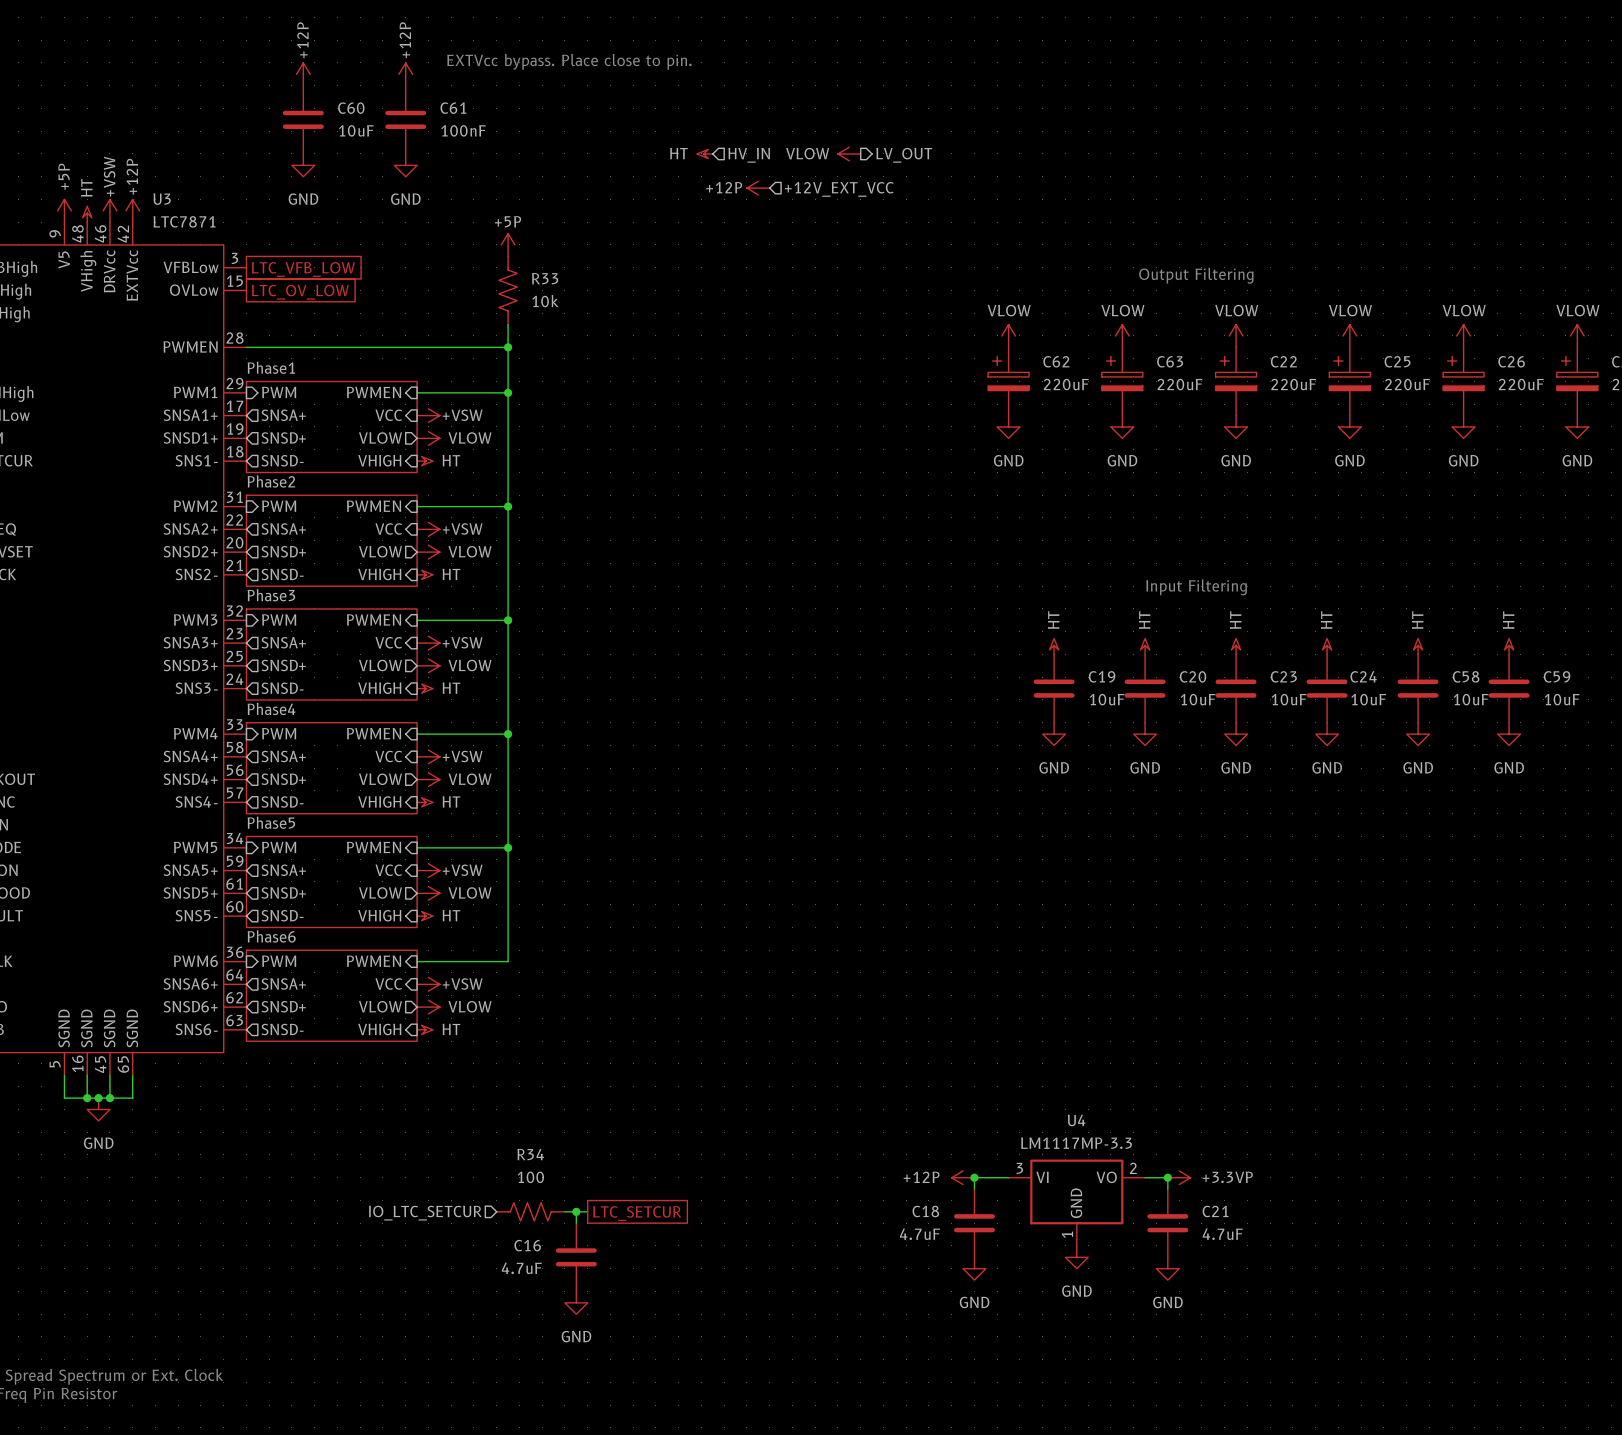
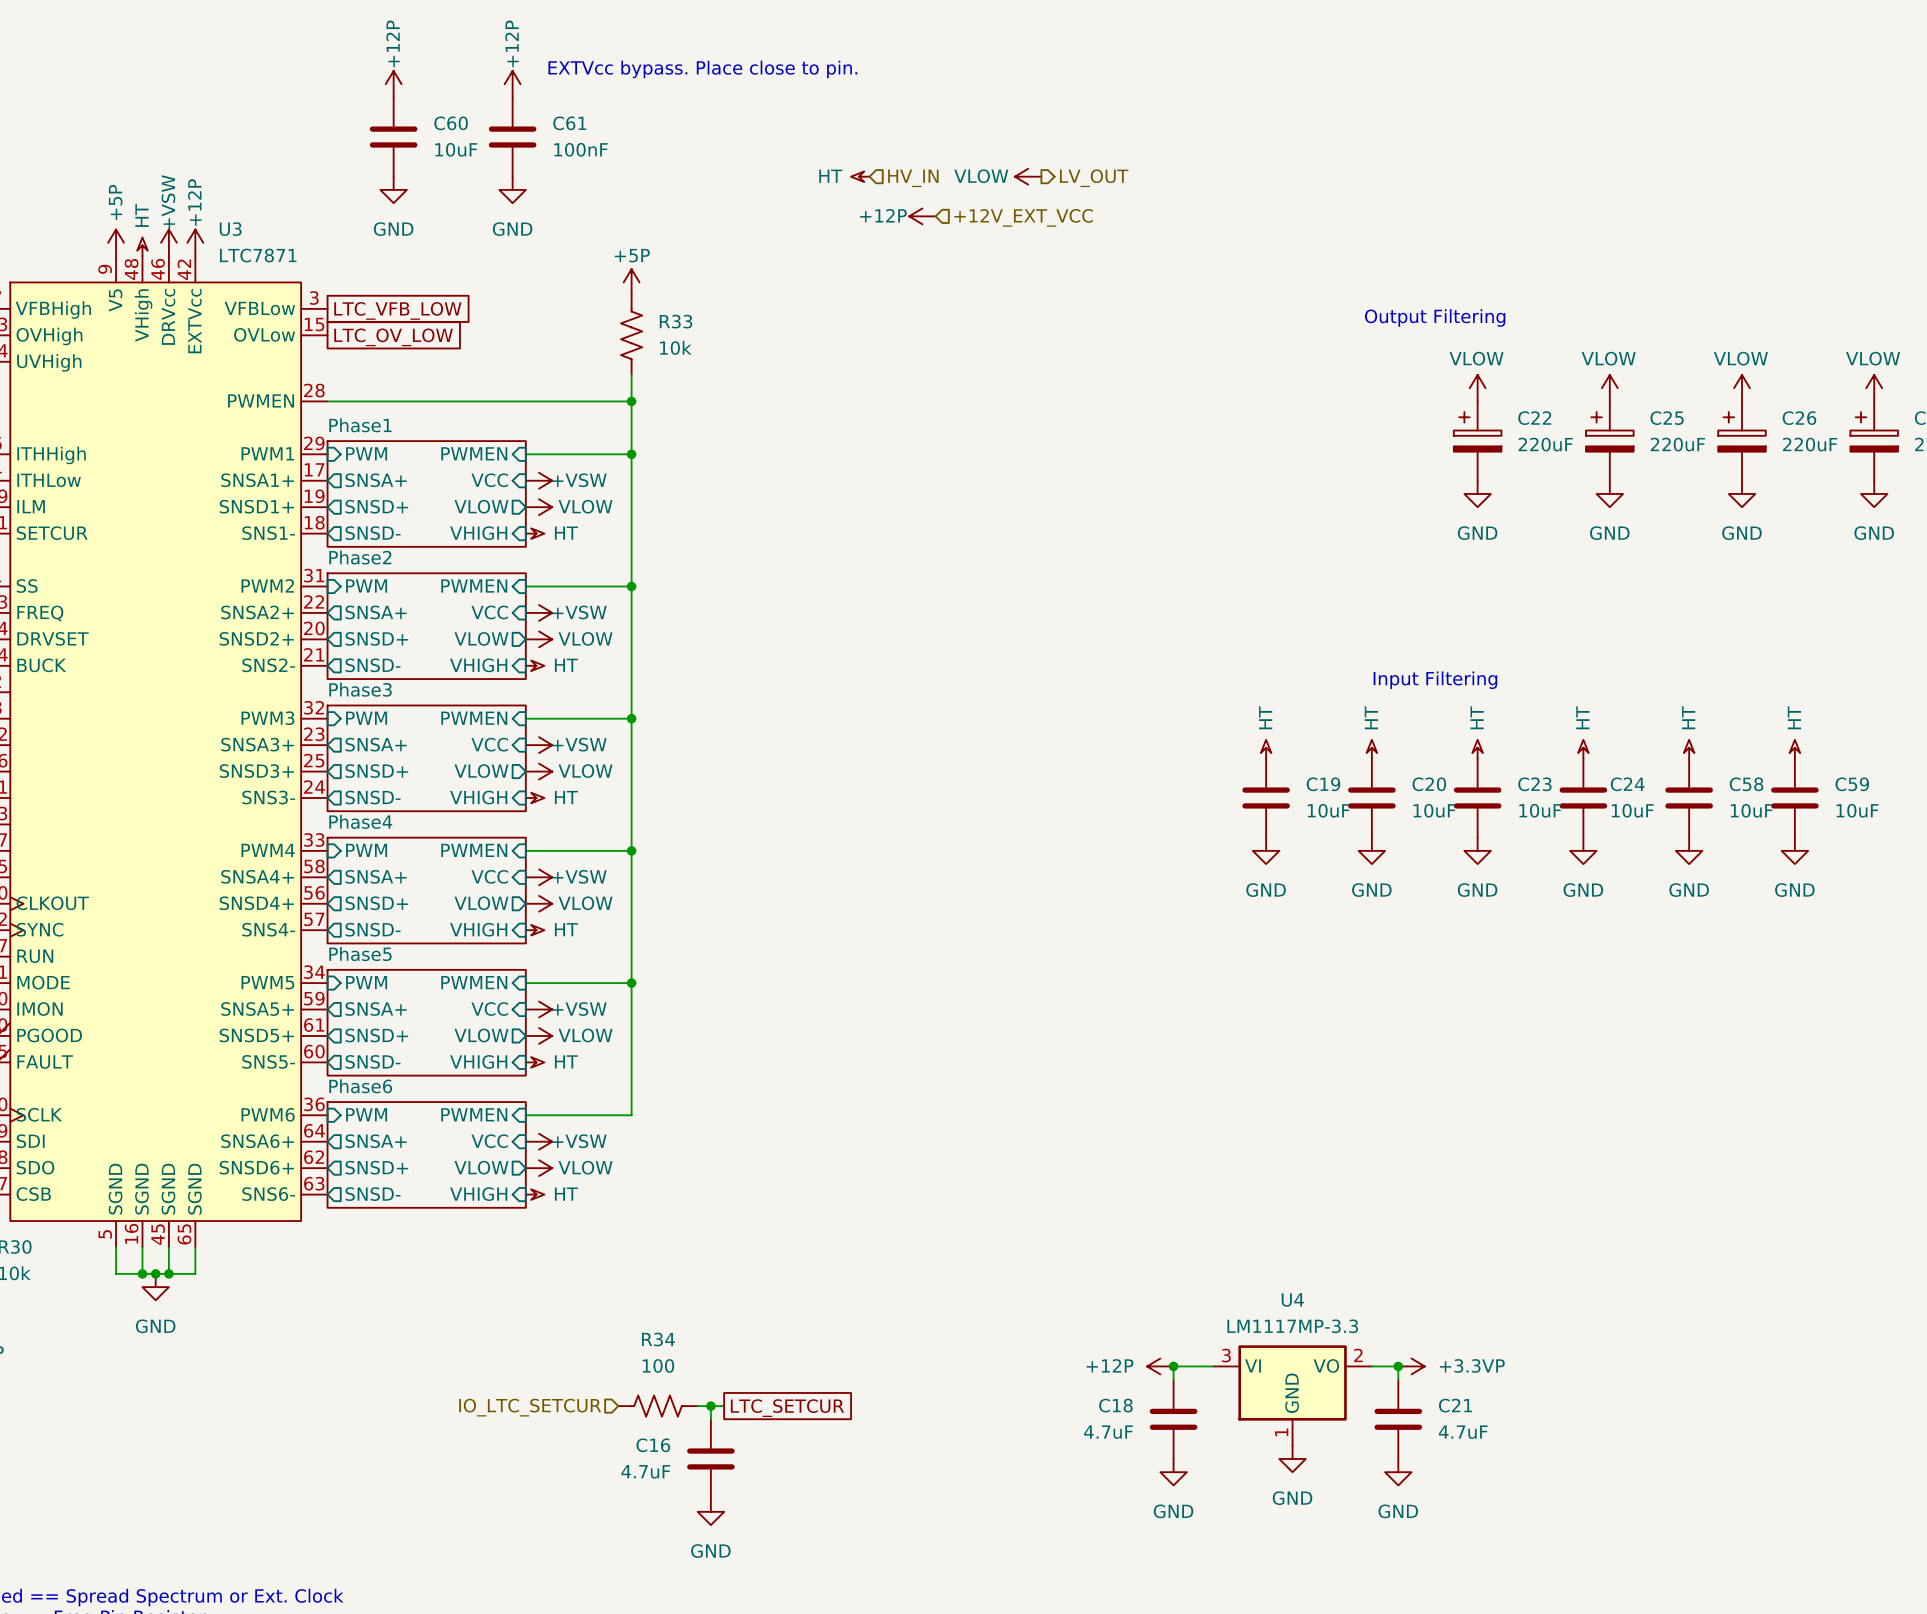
power symbol: VLOW (1008, 335) -> none
power symbol: VLOW (1122, 335) -> none
C62: 220uF (1008, 381) -> none
C63: 220uF (1122, 381) -> none
power symbol: GND (1008, 426) -> none
power symbol: GND (1122, 426) -> none

